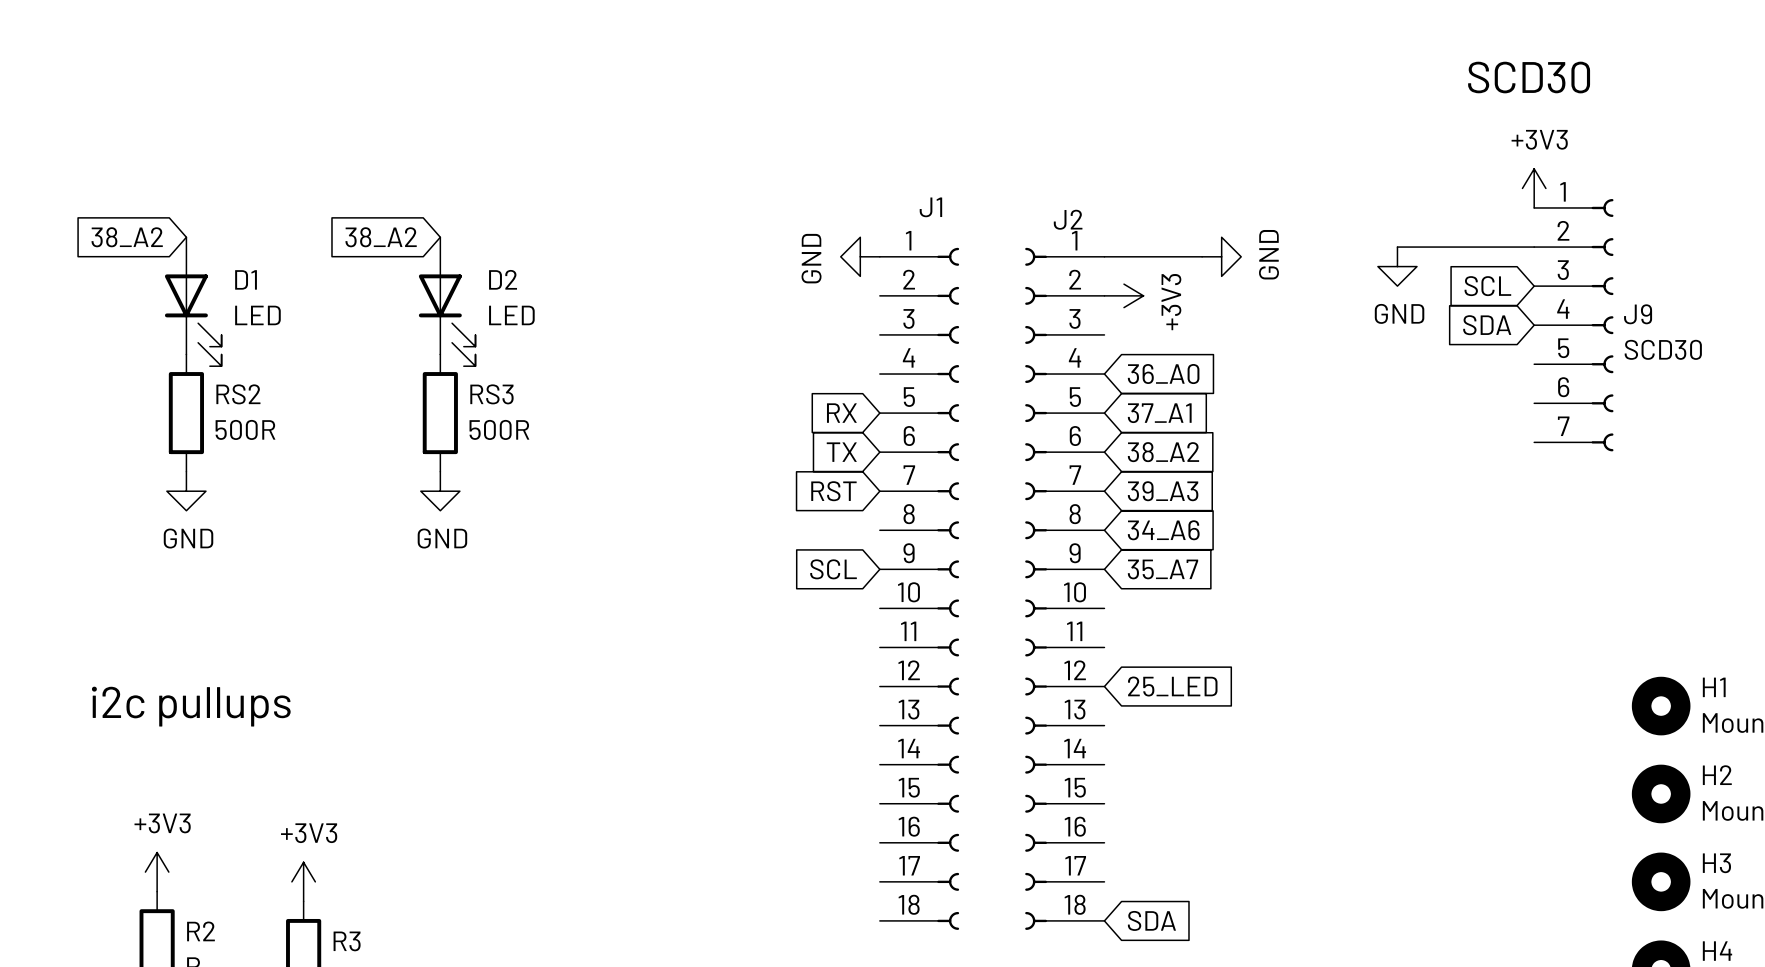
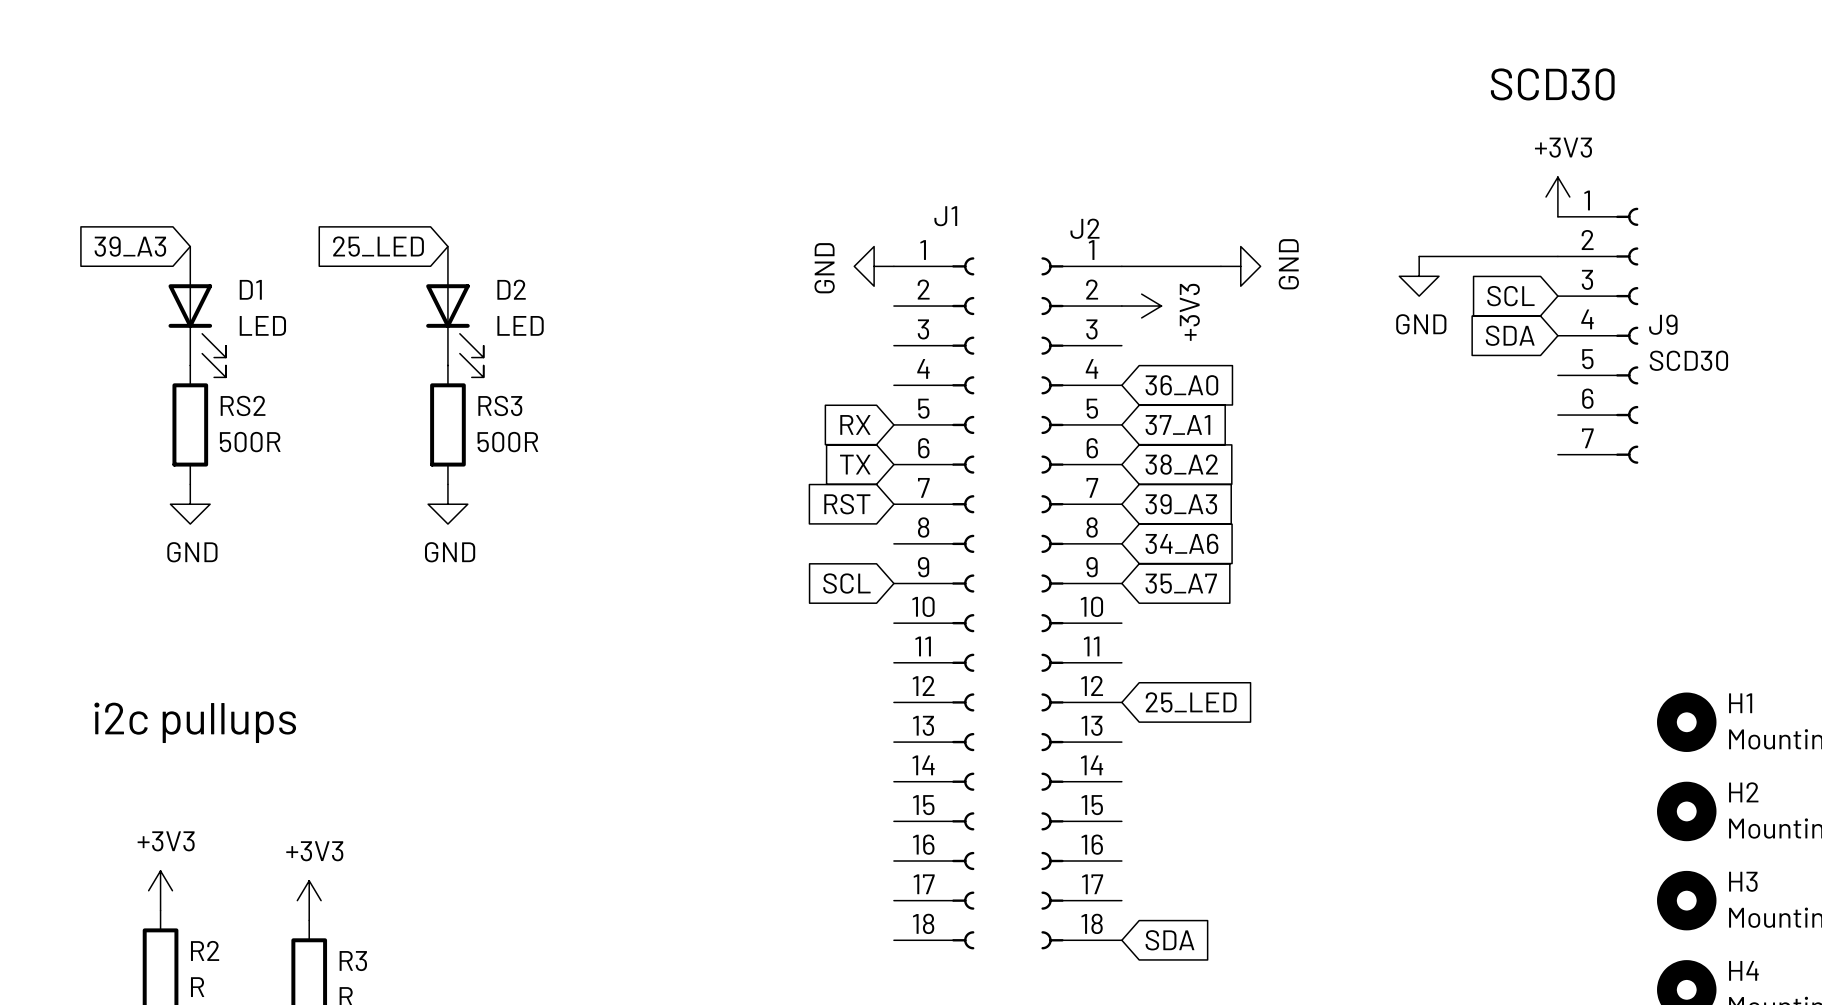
global label: 38_A2 (127, 237) -> 39_A3 (130, 246)
global label: 38_A2 (381, 237) -> 25_LED (378, 246)

